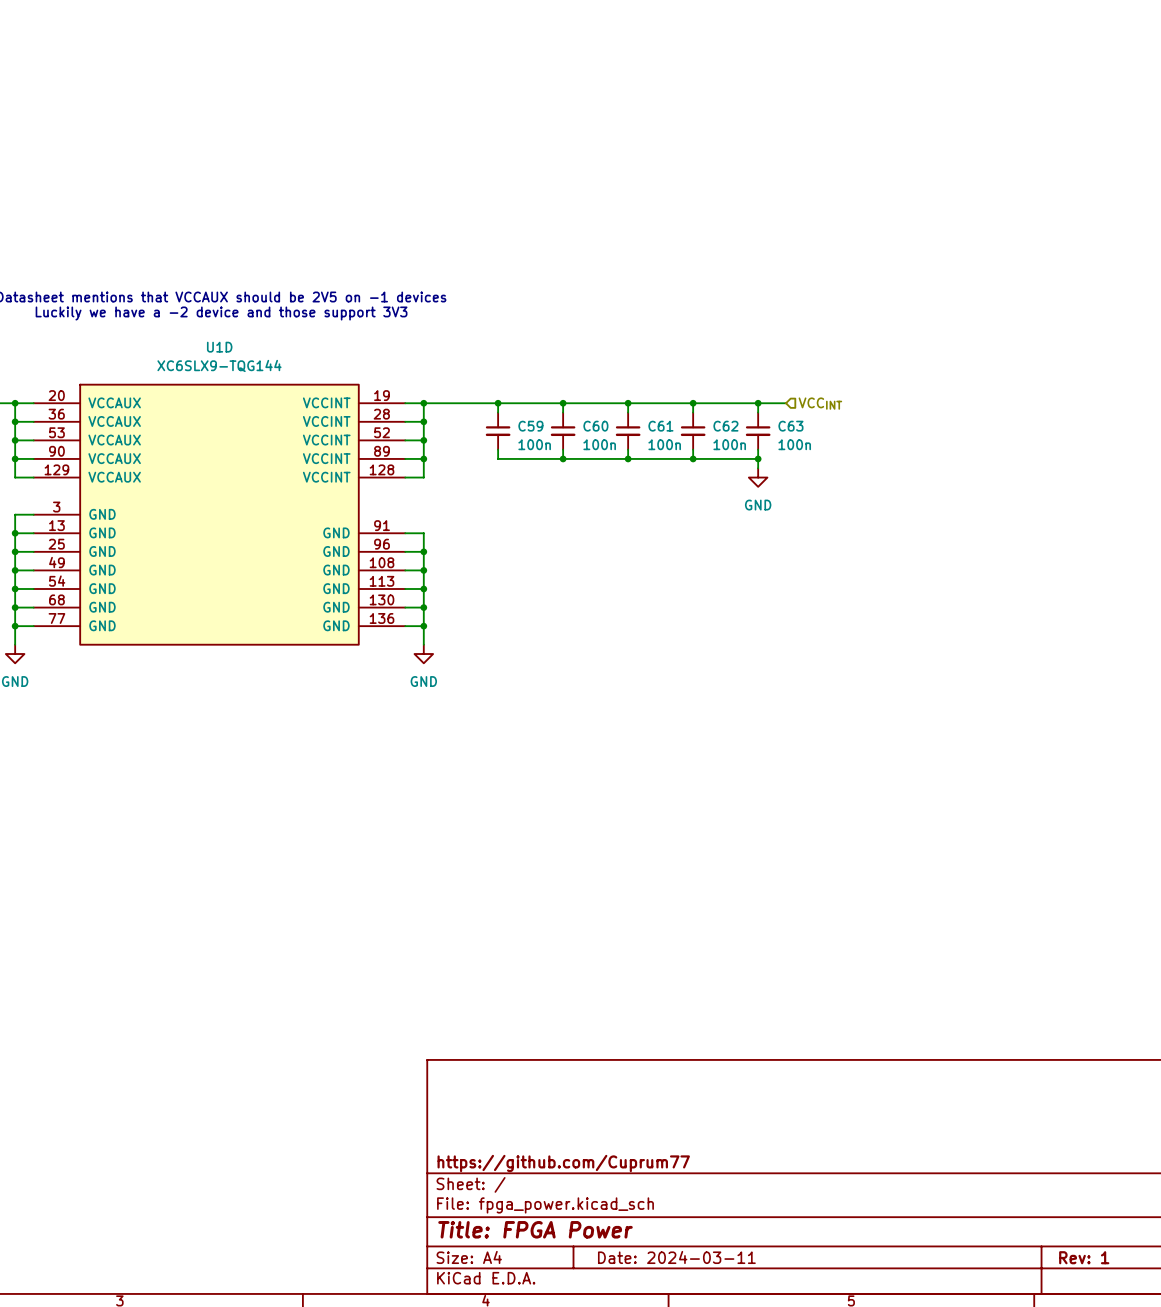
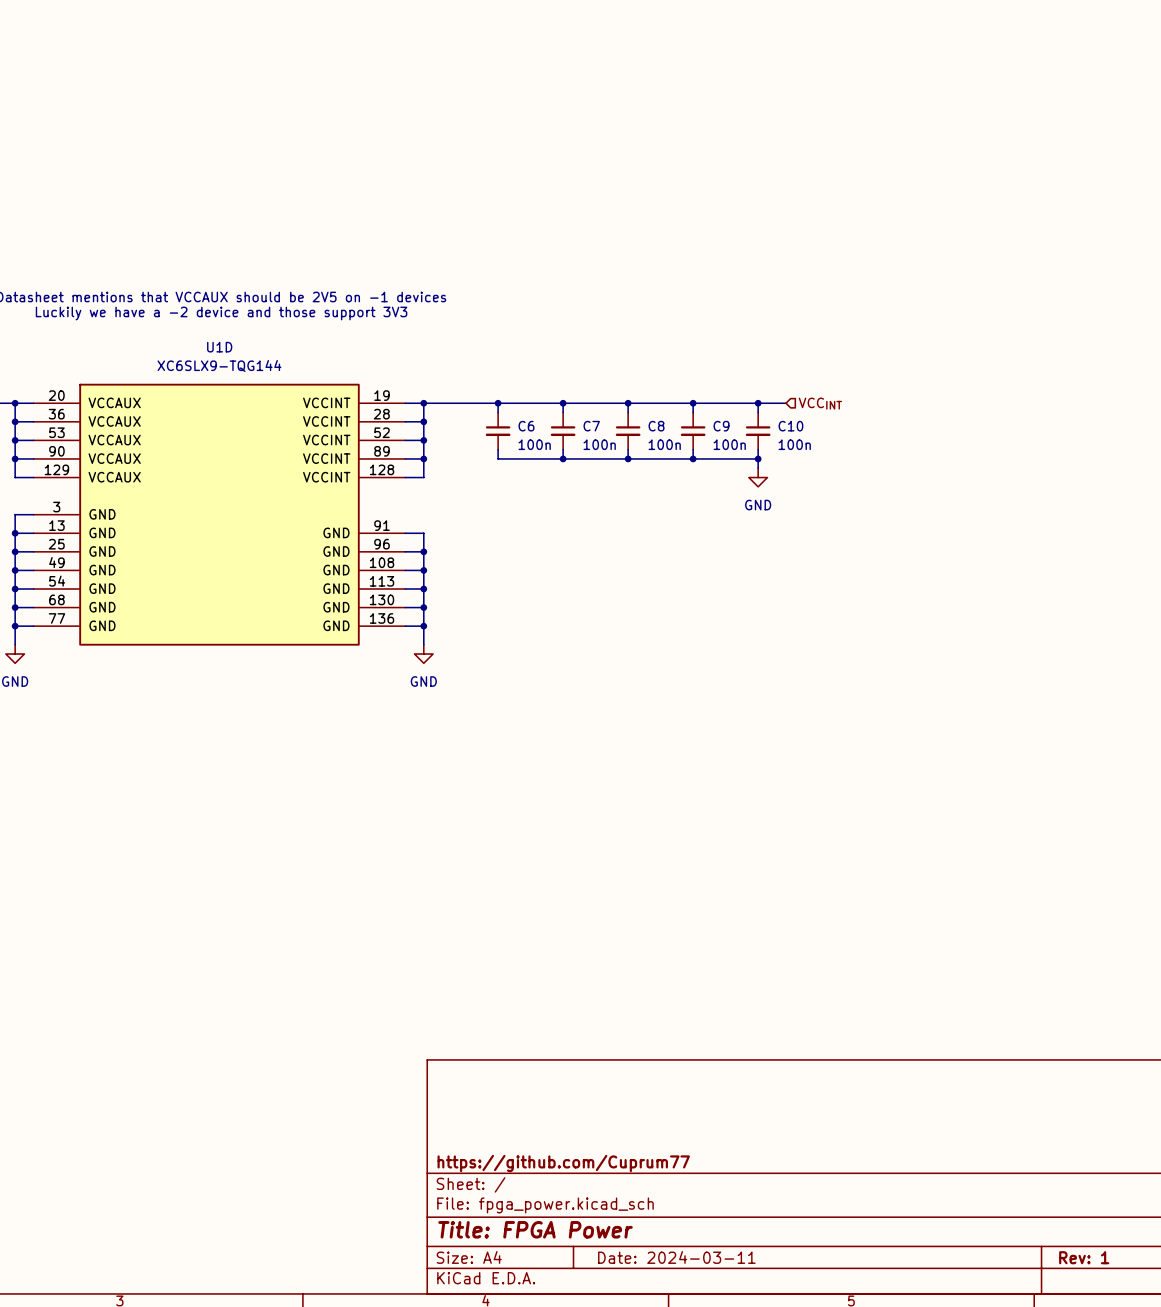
C59 name: C59 (530, 426) -> C6 (526, 426)
C60 name: C60 (595, 426) -> C7 (591, 426)
C61 name: C61 (660, 426) -> C8 (656, 426)
C62 name: C62 (725, 426) -> C9 (721, 426)
C63 name: C63 (790, 426) -> C10 (790, 426)

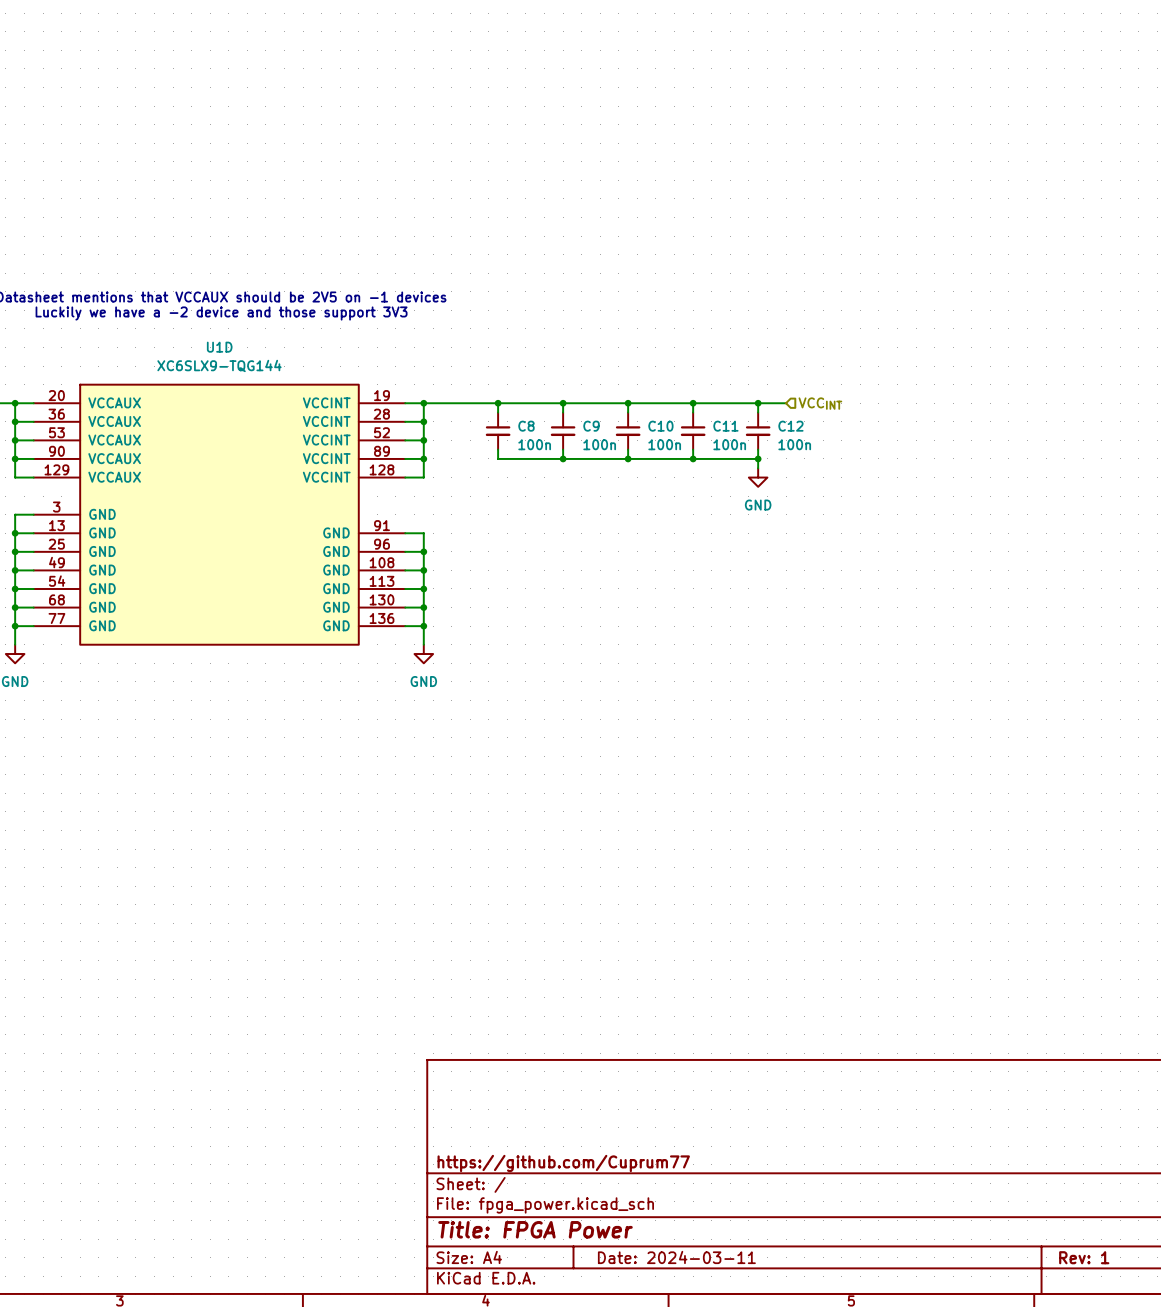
C6 name: C6 (526, 426) -> C8 (526, 426)
C7 name: C7 (591, 426) -> C9 (591, 426)
C8 name: C8 (656, 426) -> C10 (660, 426)
C9 name: C9 (721, 426) -> C11 (725, 426)
C10 name: C10 (790, 426) -> C12 (790, 426)

